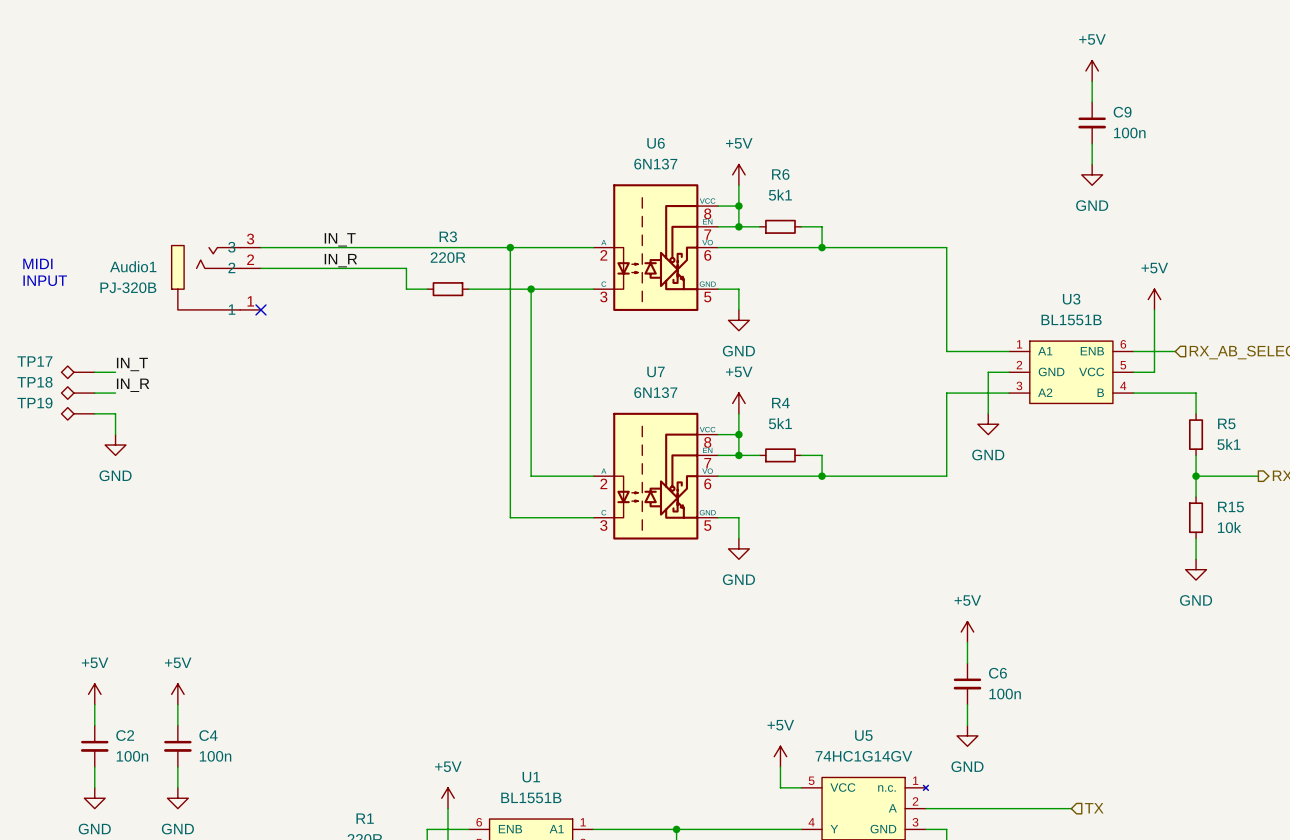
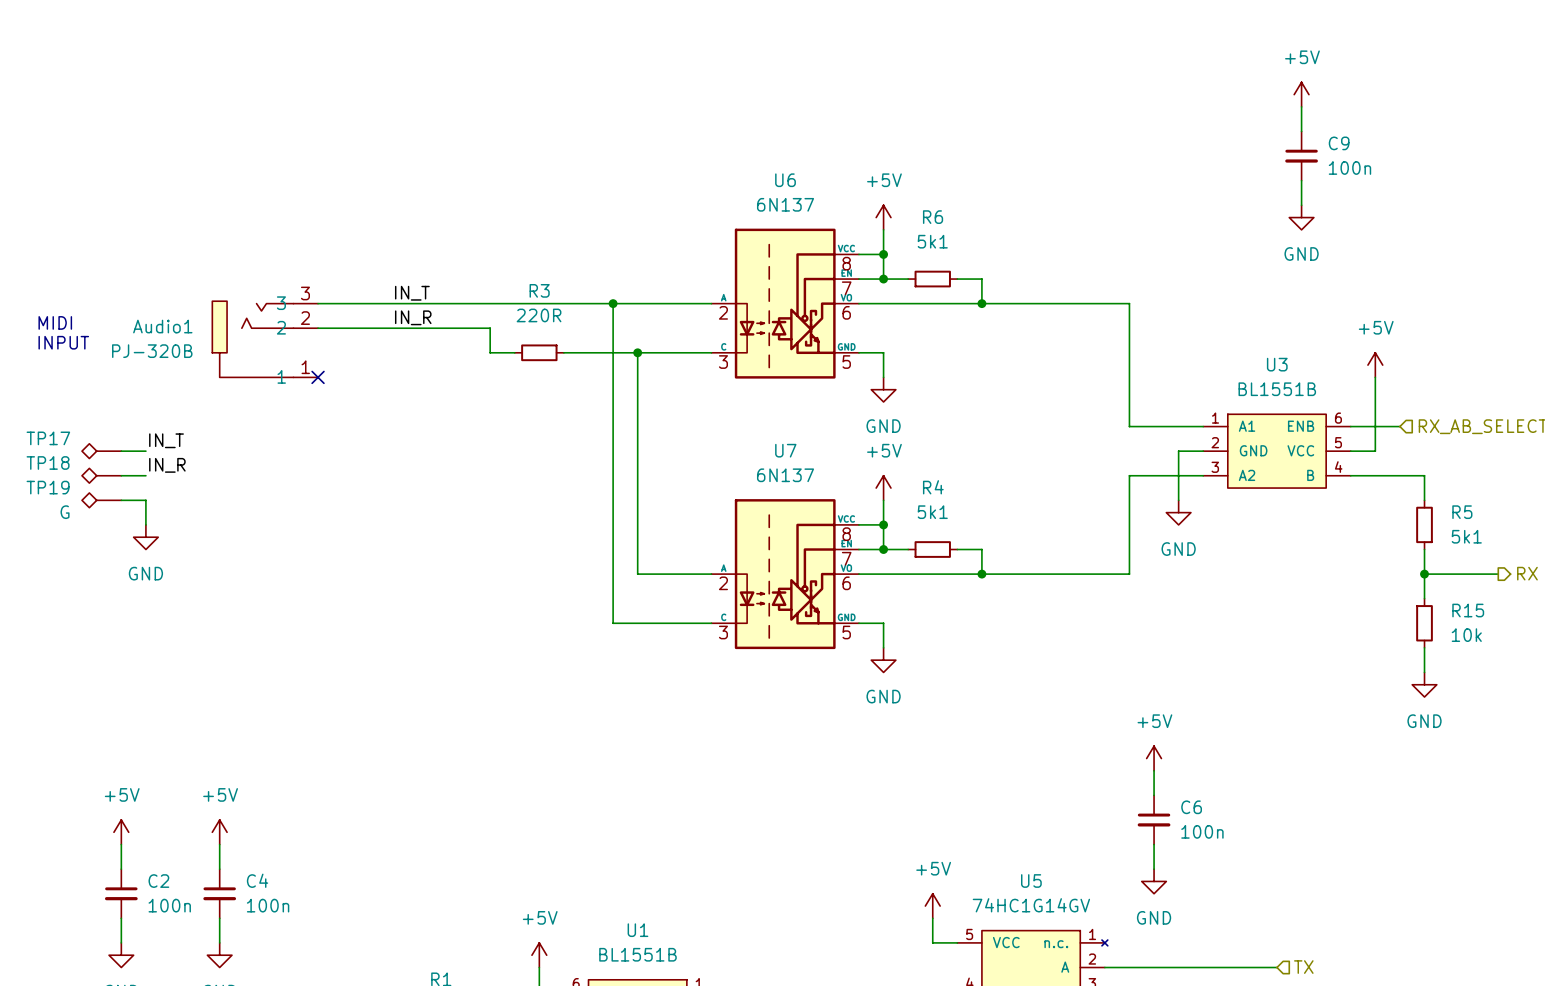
TP19 value: none -> G (65, 512)

